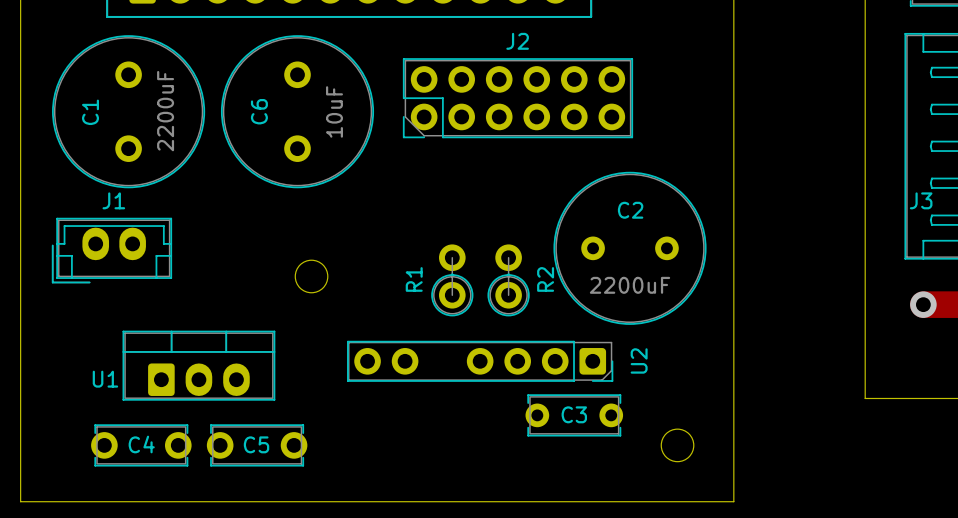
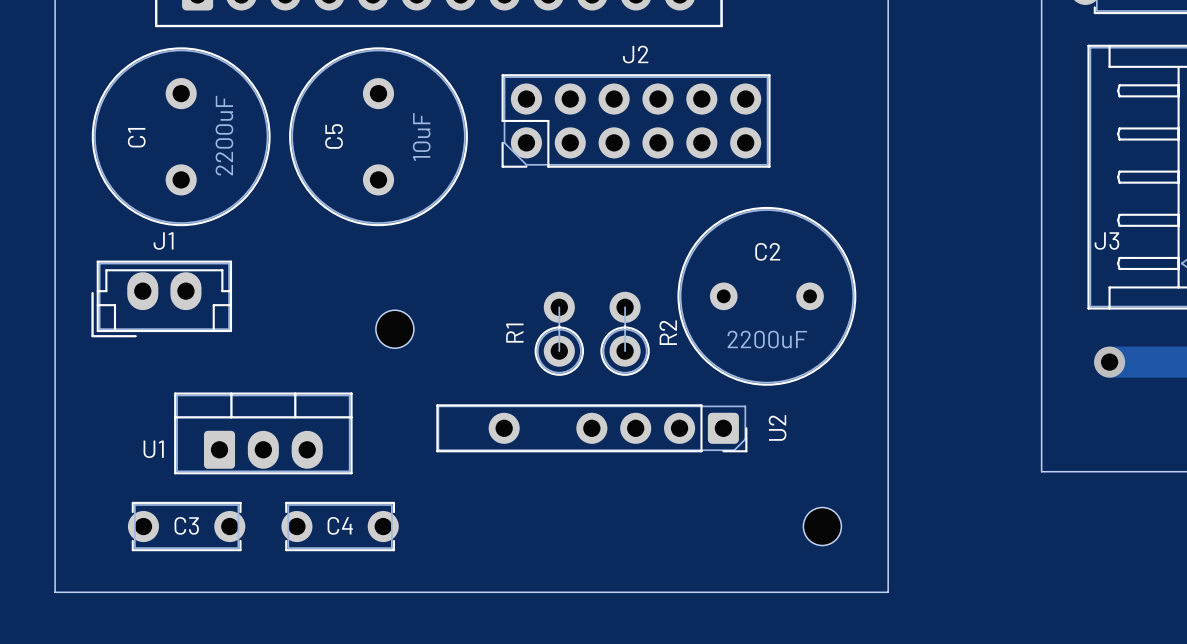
C6 name: C6 (259, 111) -> C5 (334, 136)
U2 footprint: [347, 340, 614, 382] -> [436, 404, 748, 453]
C3 footprint: [525, 394, 624, 437] -> [127, 501, 246, 552]
C4 position: (141, 445) -> (340, 526)
C5: (257, 445) -> none

